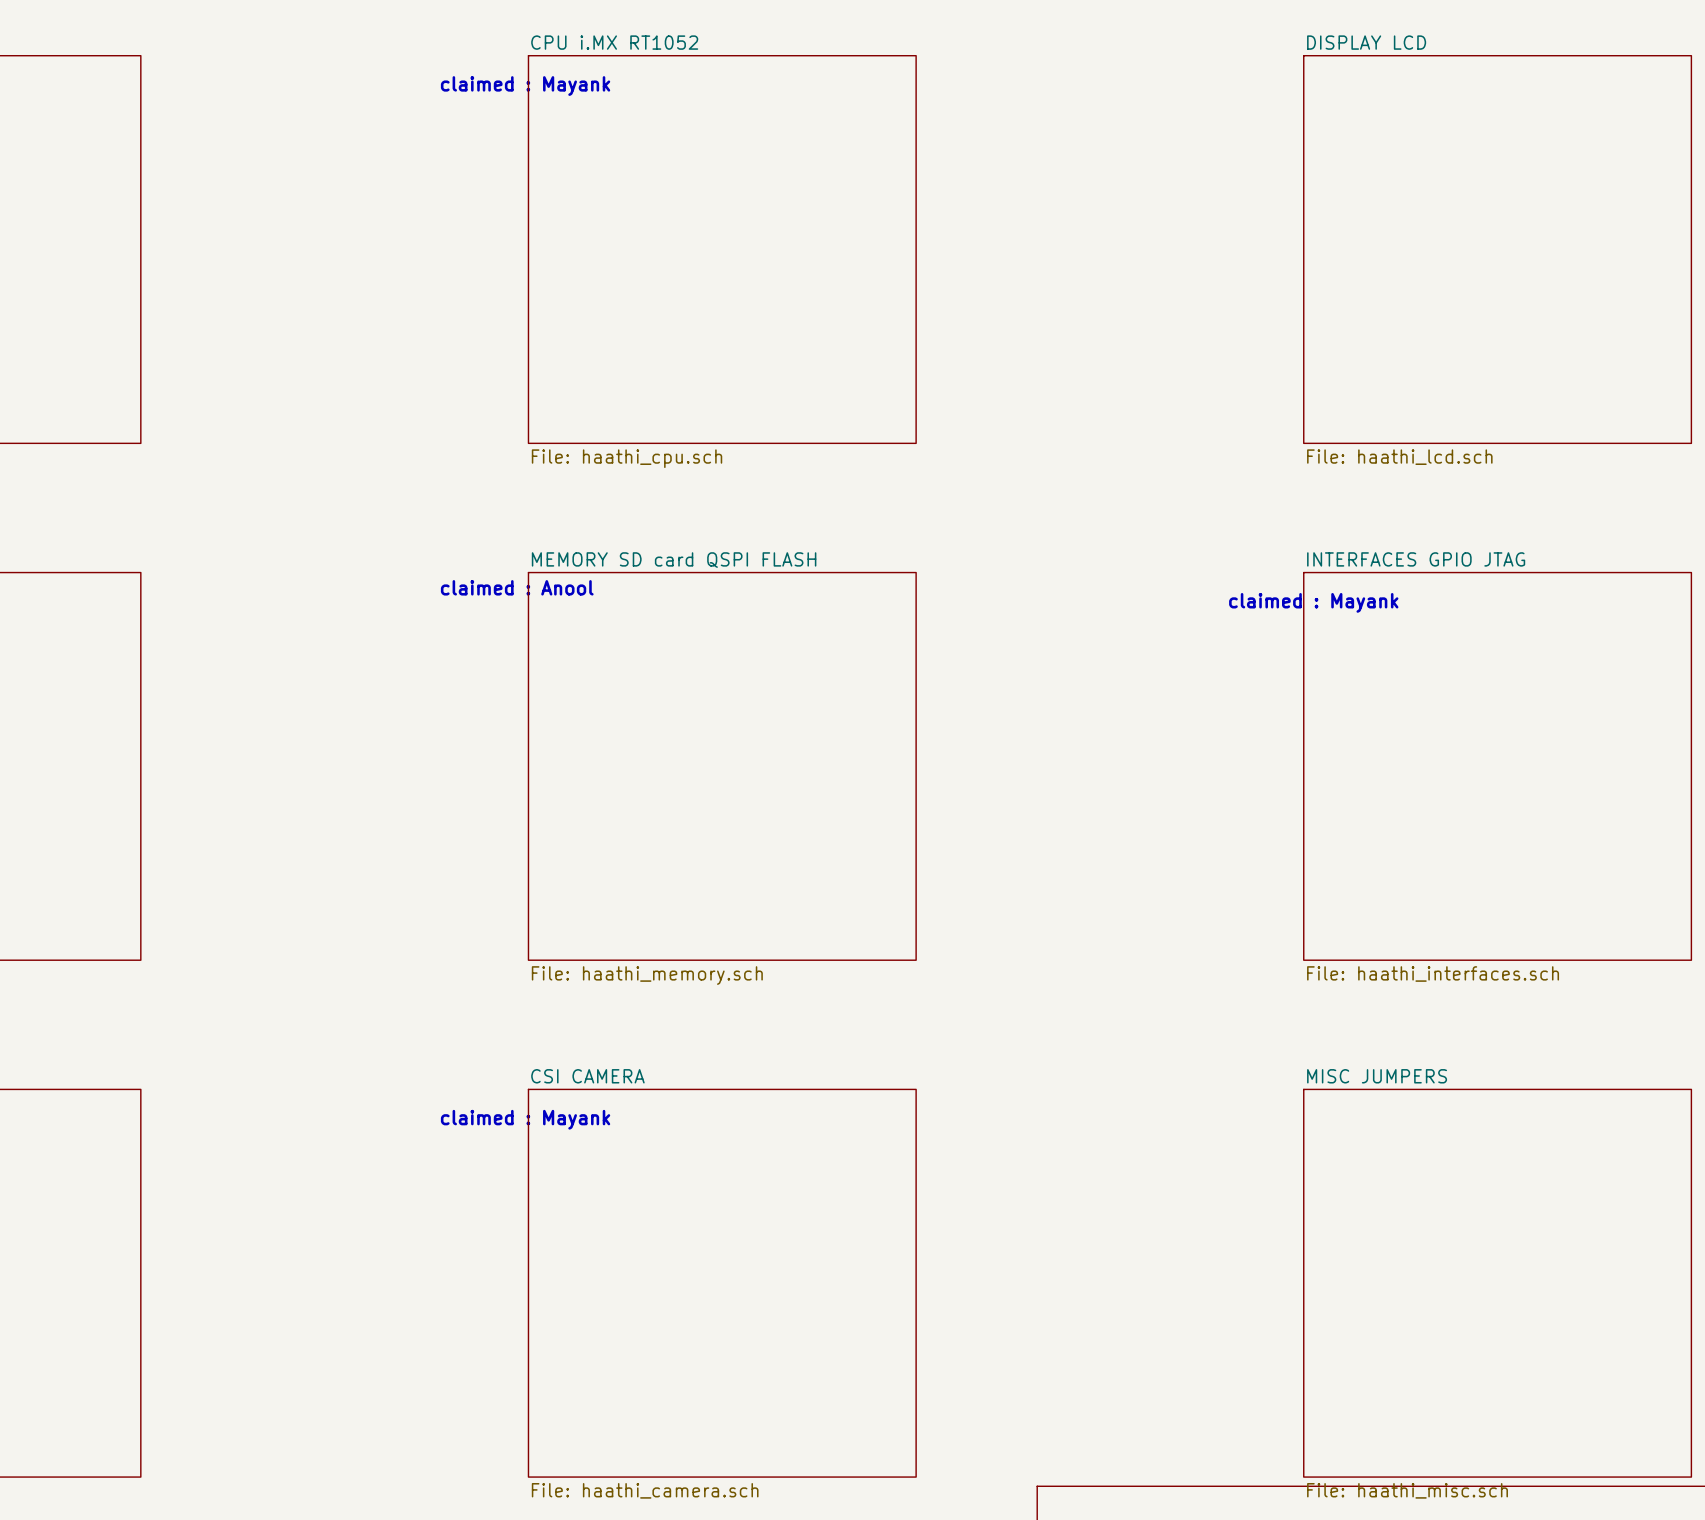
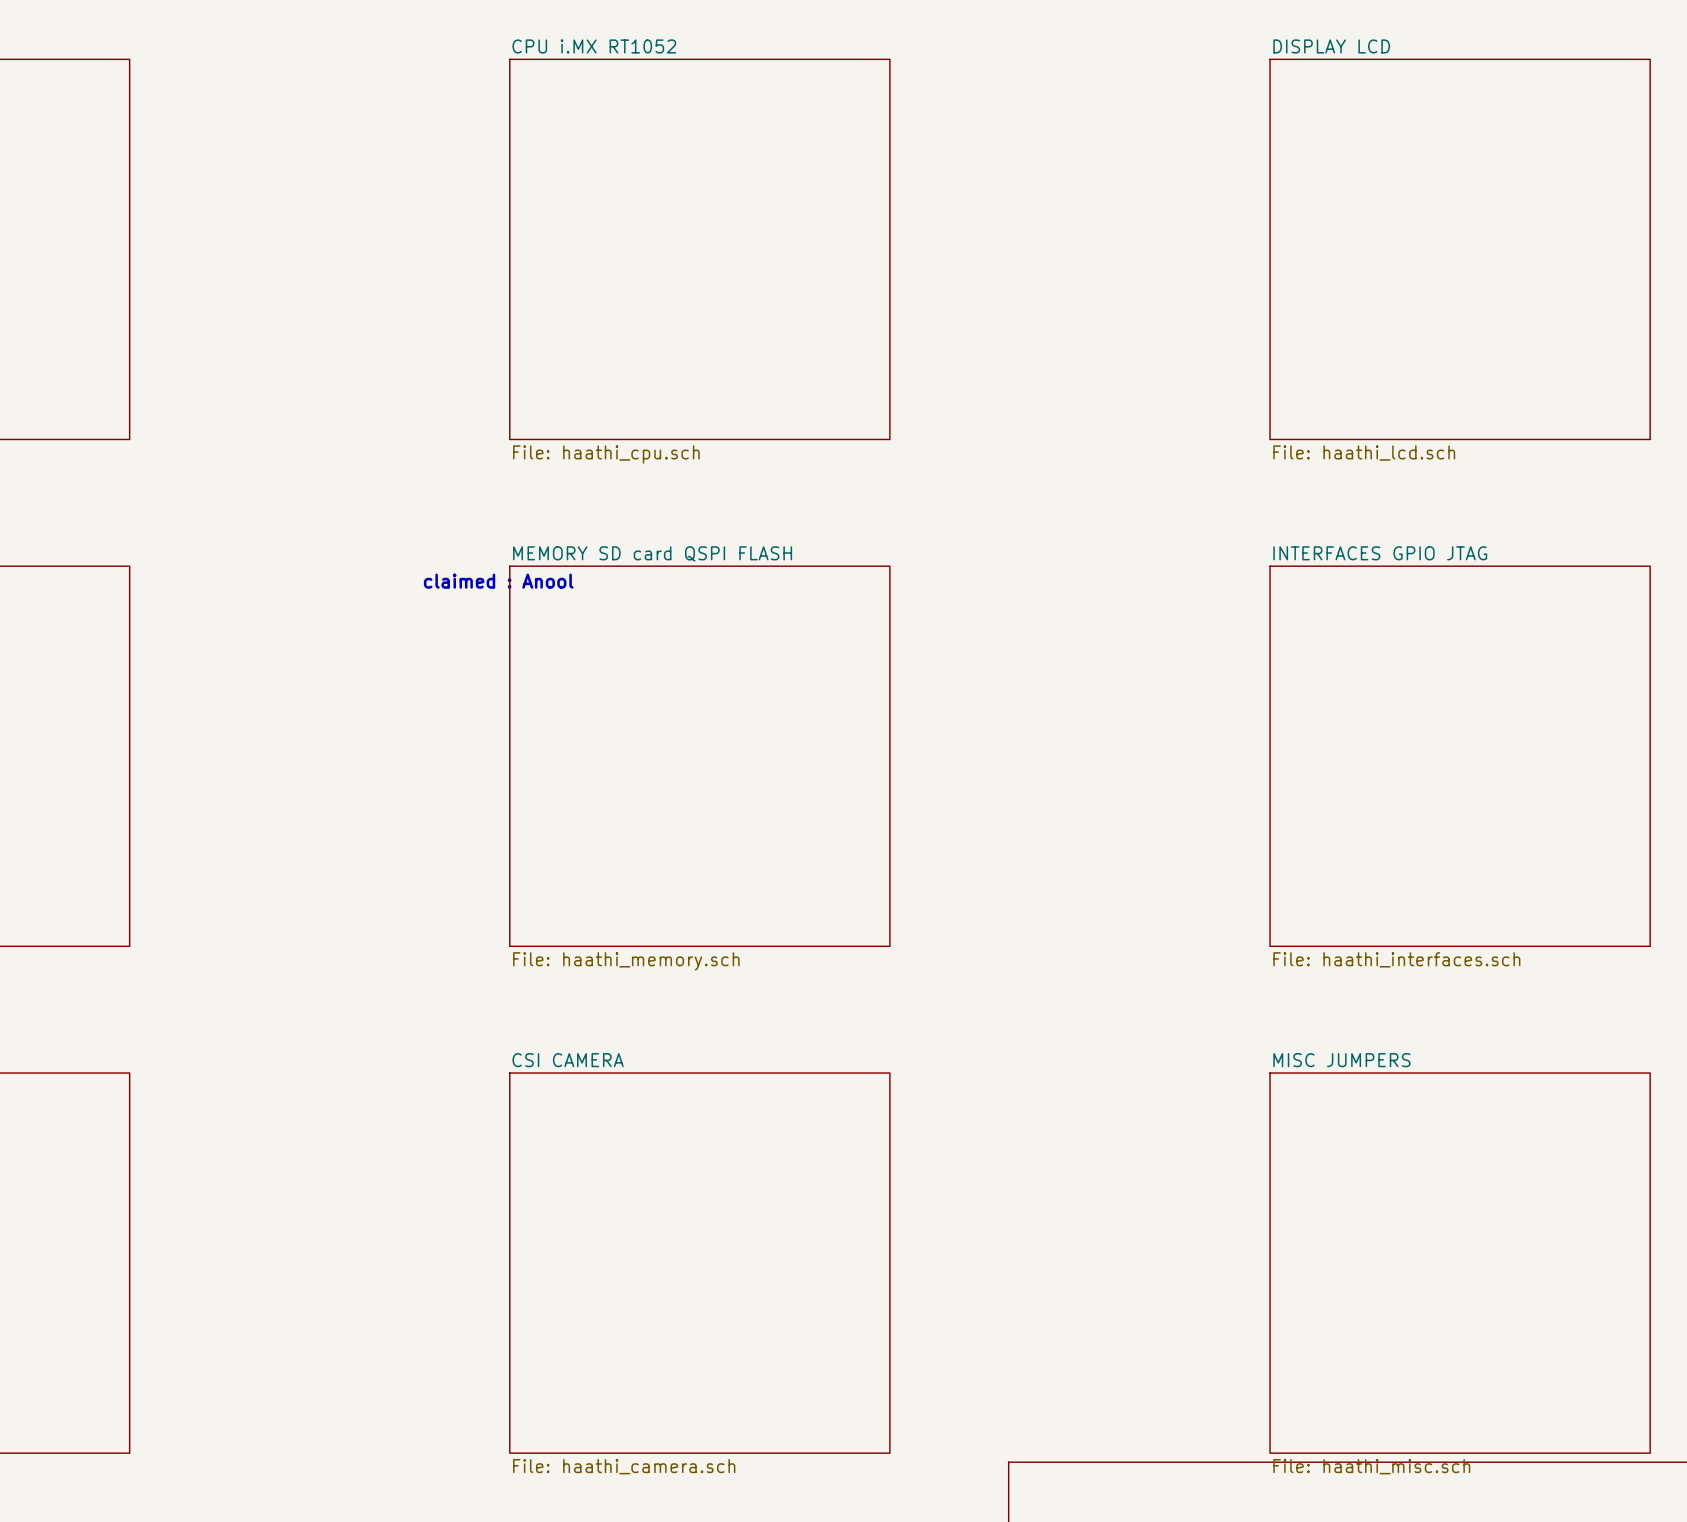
text: claimed : Mayank (525, 86) -> none
text: claimed : Mayank (1313, 602) -> none
text: claimed : Mayank (525, 1119) -> none

